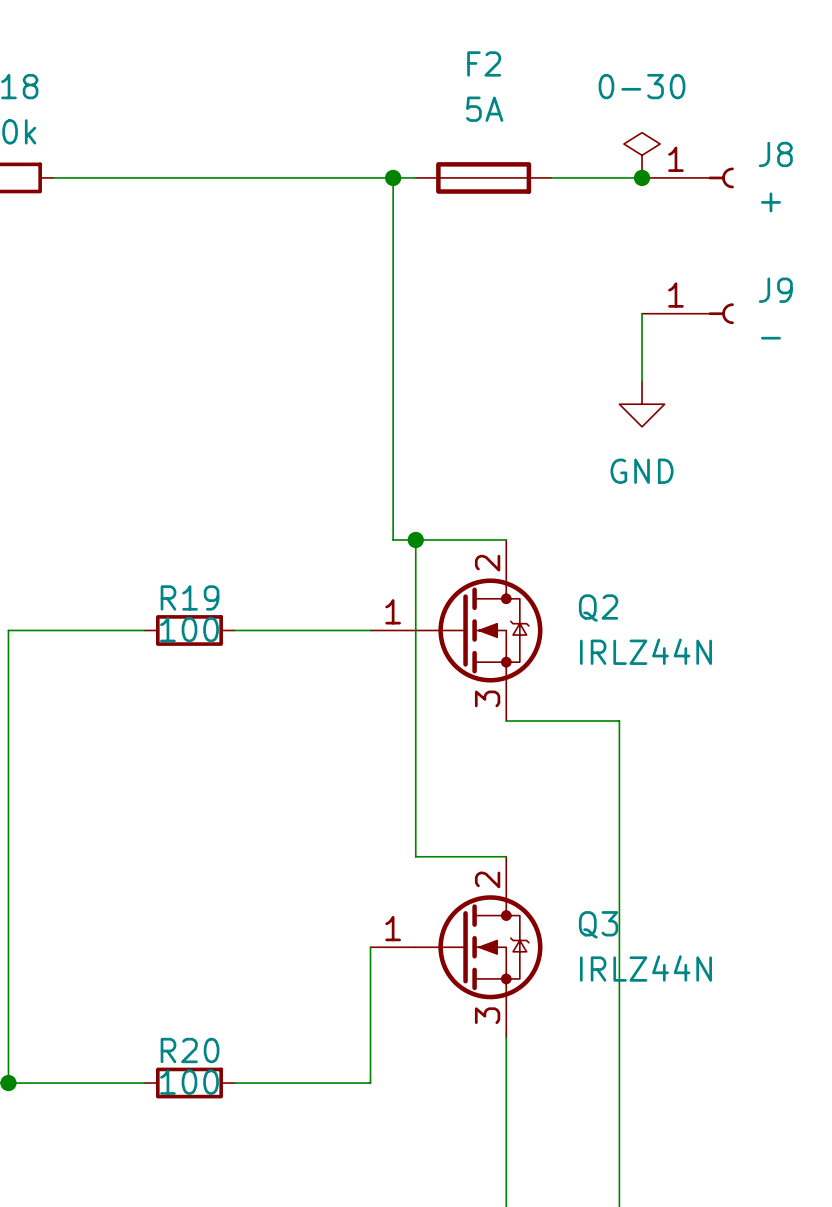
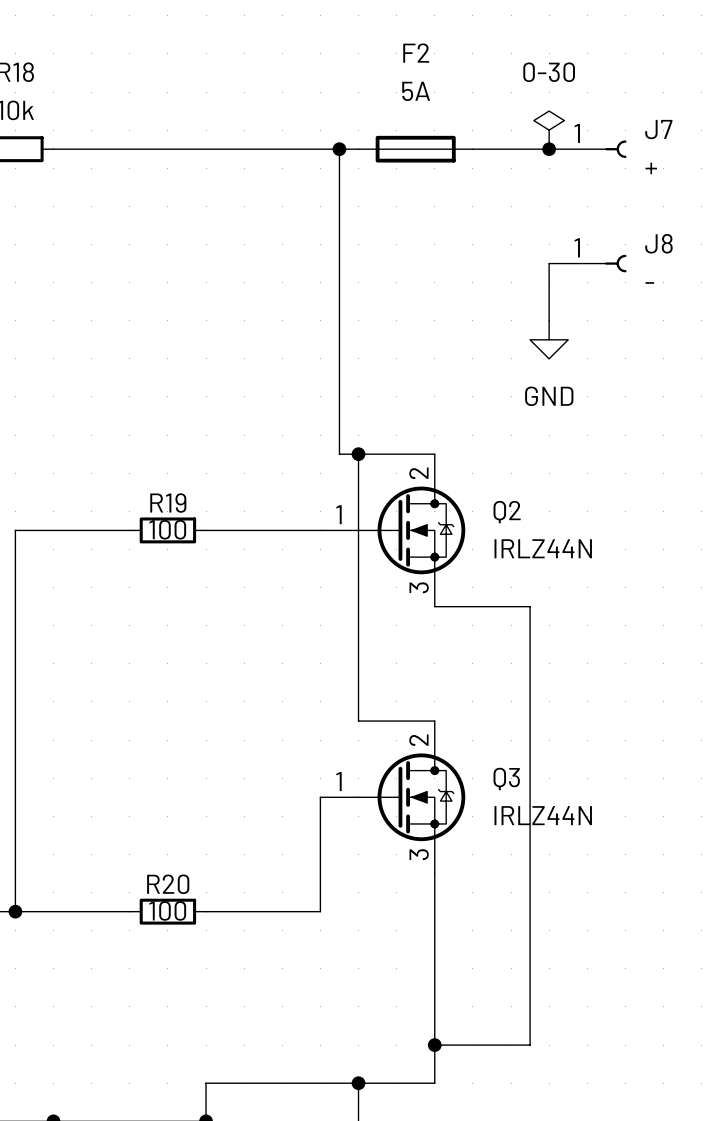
J8 name: J8 (775, 154) -> J7 (658, 129)
J9 name: J9 (775, 290) -> J8 (658, 243)

